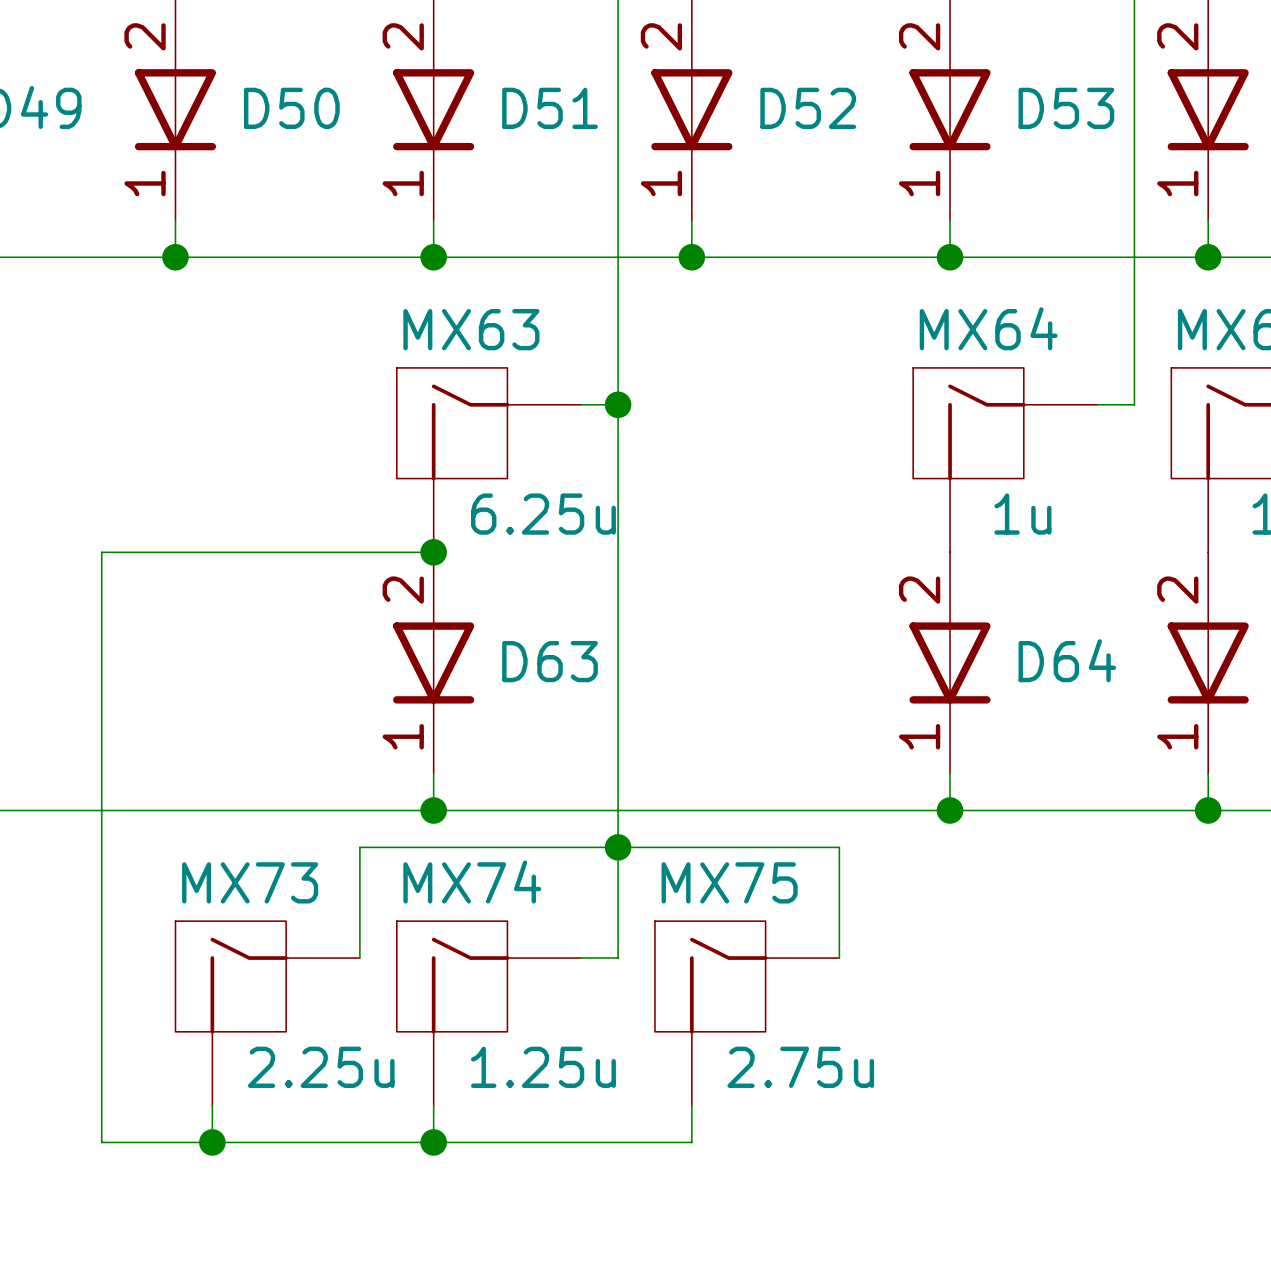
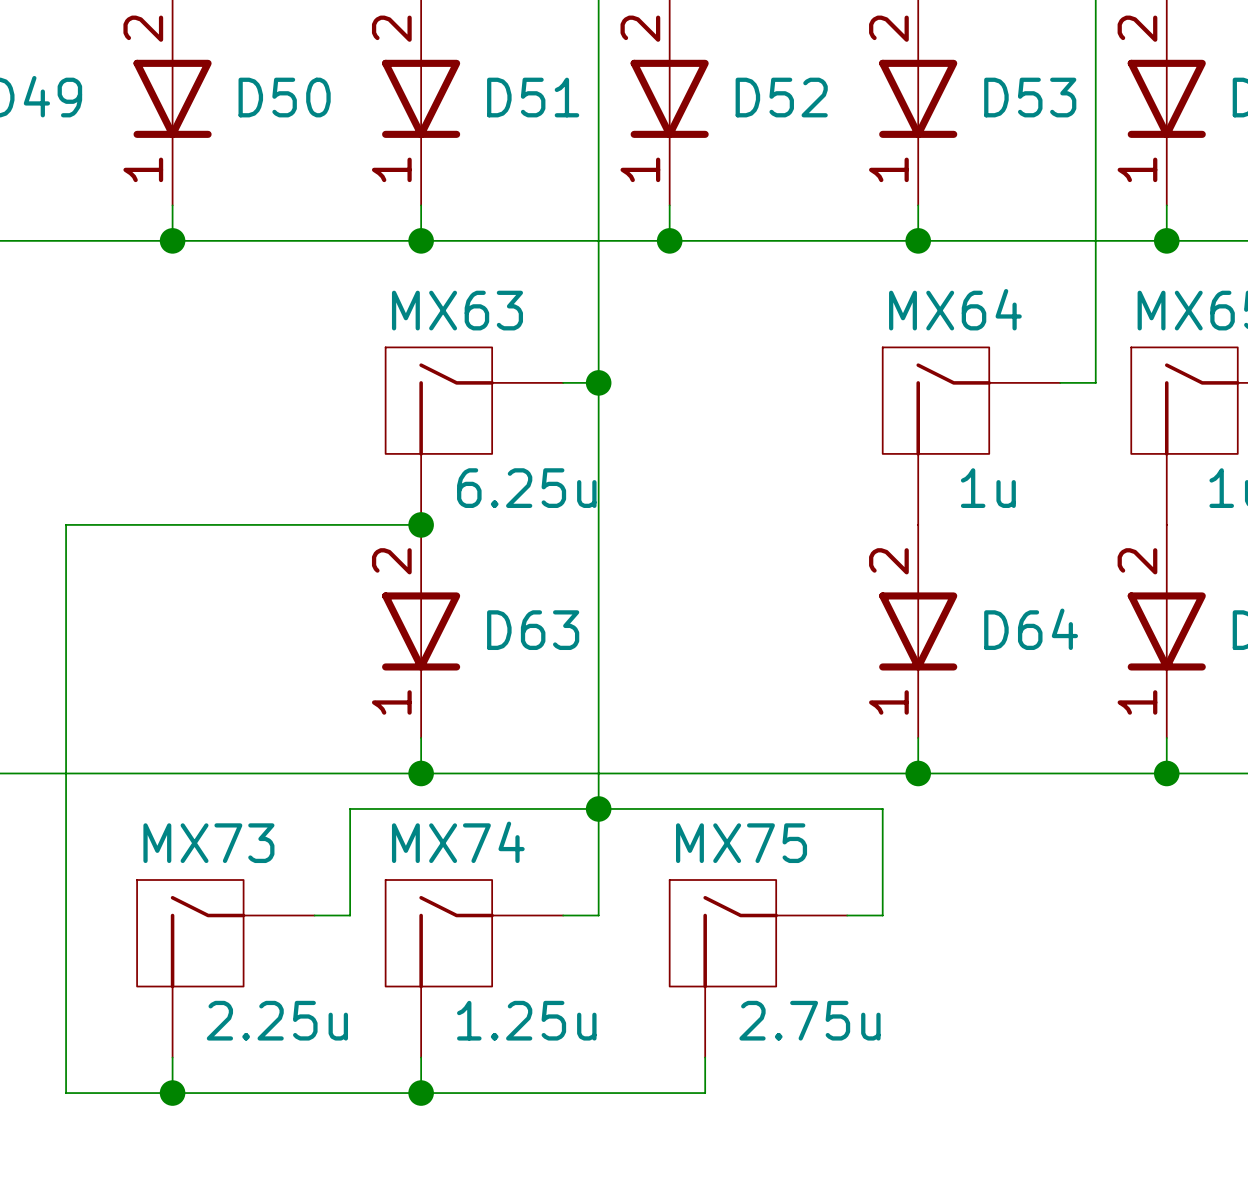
wire: (101, 552) (101, 1142) -> (101, 524) (66, 524) (66, 1093) (101, 1093)
wire: (839, 847) (839, 958) -> (811, 808) (882, 808) (882, 915) (847, 915)
MX73 position: (267, 1013) -> (225, 968)
MX75 position: (747, 1013) -> (758, 968)
wire: (212, 1105) (212, 1142) -> (172, 1057) (172, 1093)
wire: (691, 1105) (691, 1142) -> (705, 1057) (705, 1093) (669, 1093)
junction position: (212, 1142) -> (172, 1093)

